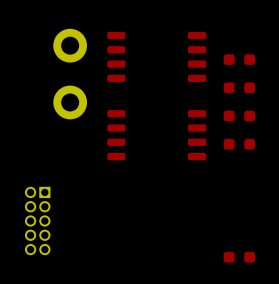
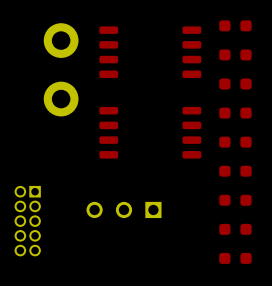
part: none -> (235, 25)
part: none -> (235, 171)
part: none -> (235, 200)
part: none -> (124, 209)
part: none -> (235, 229)

